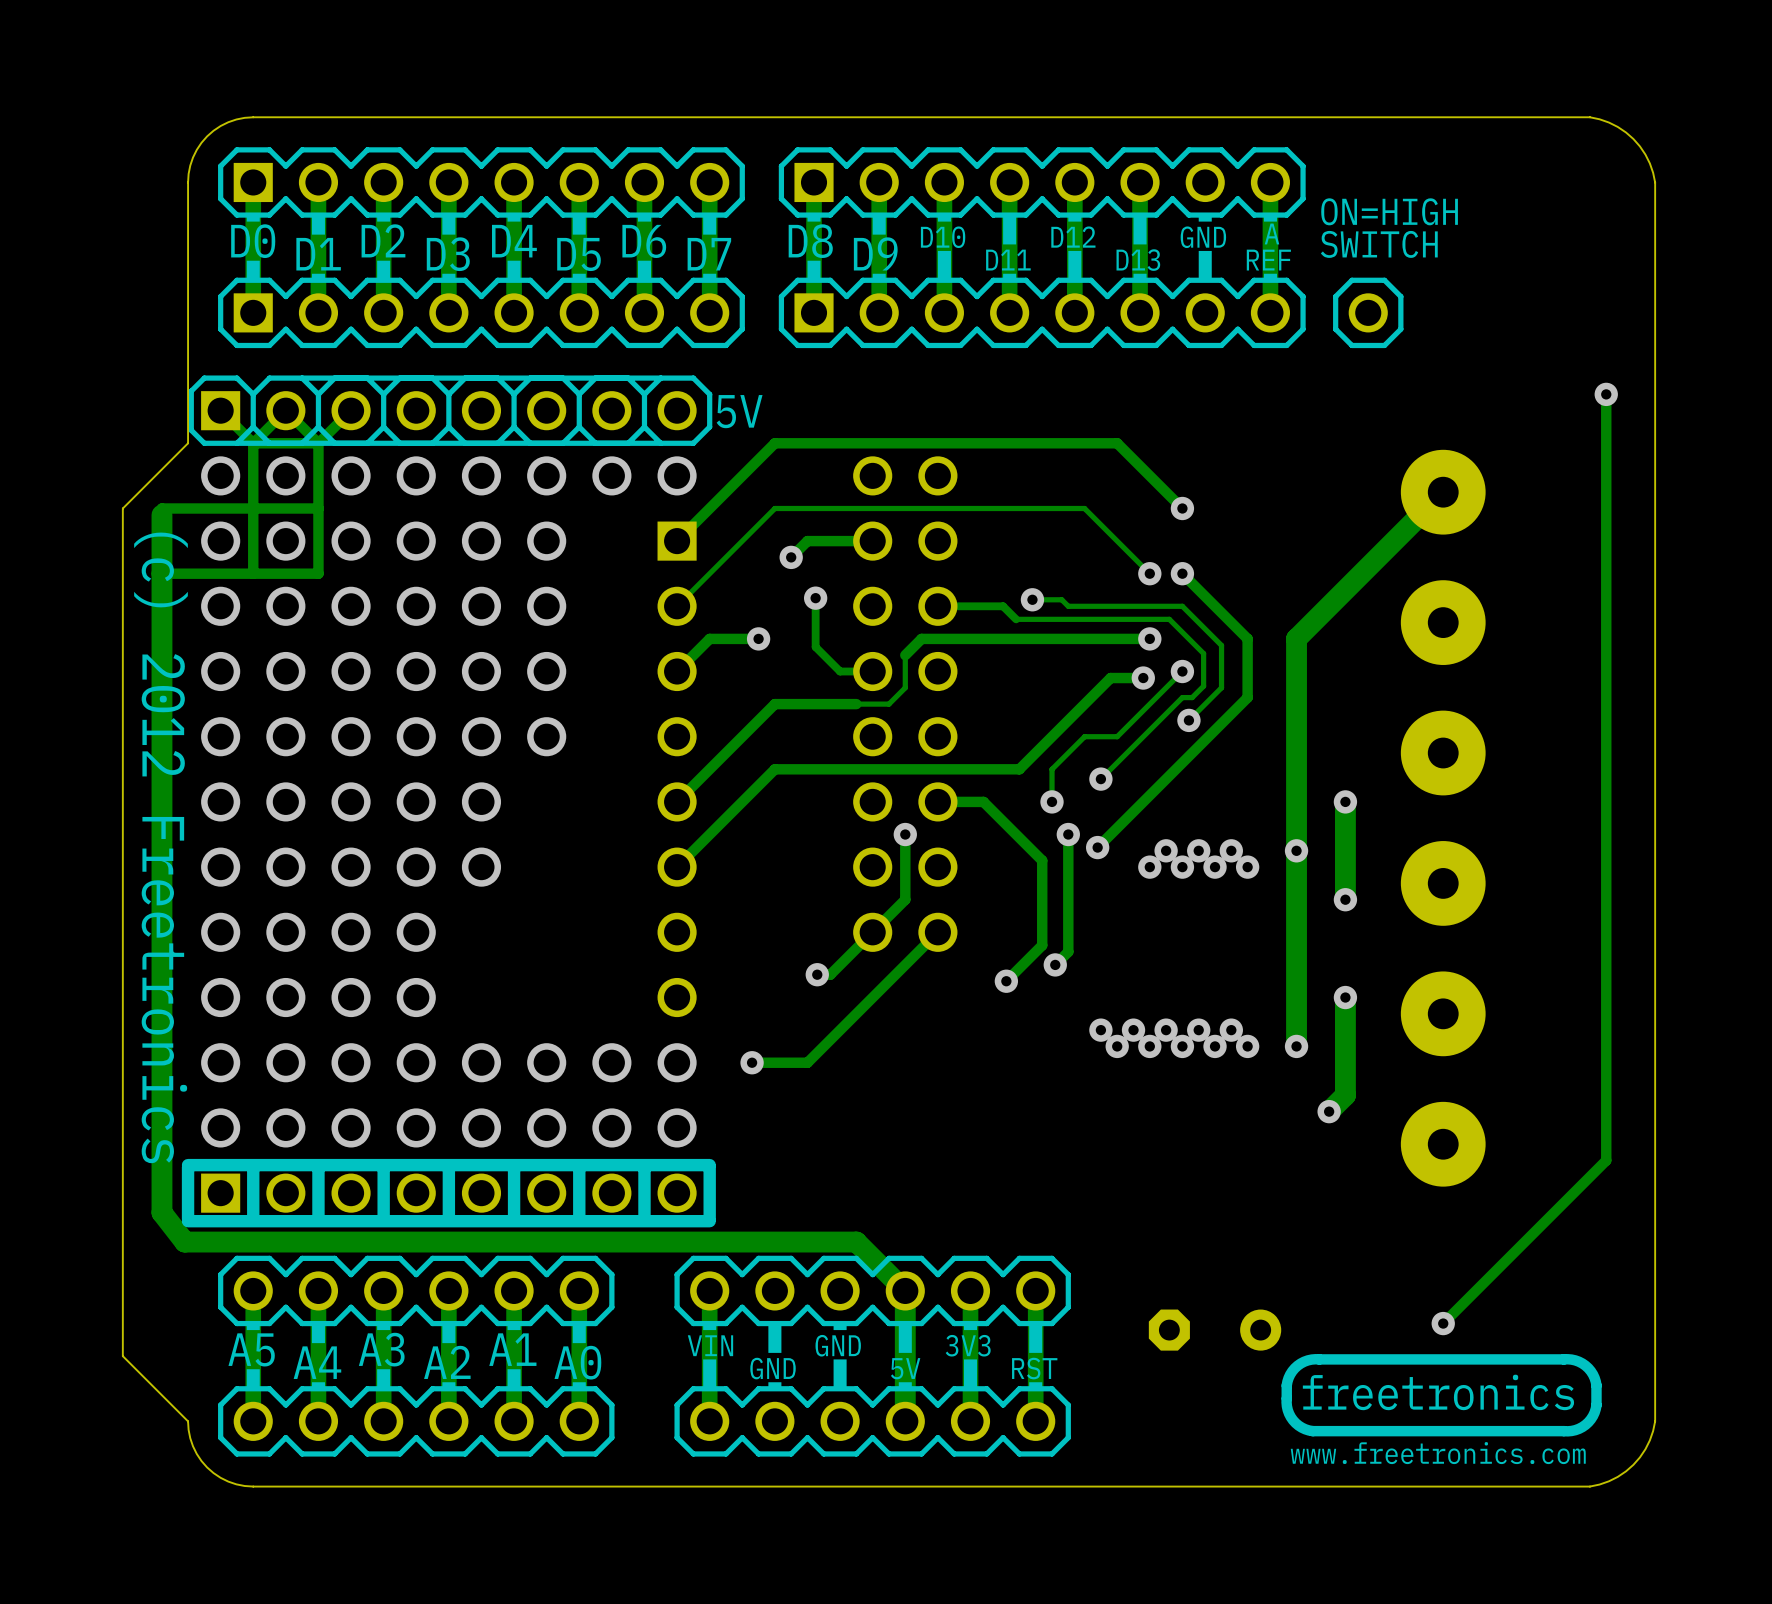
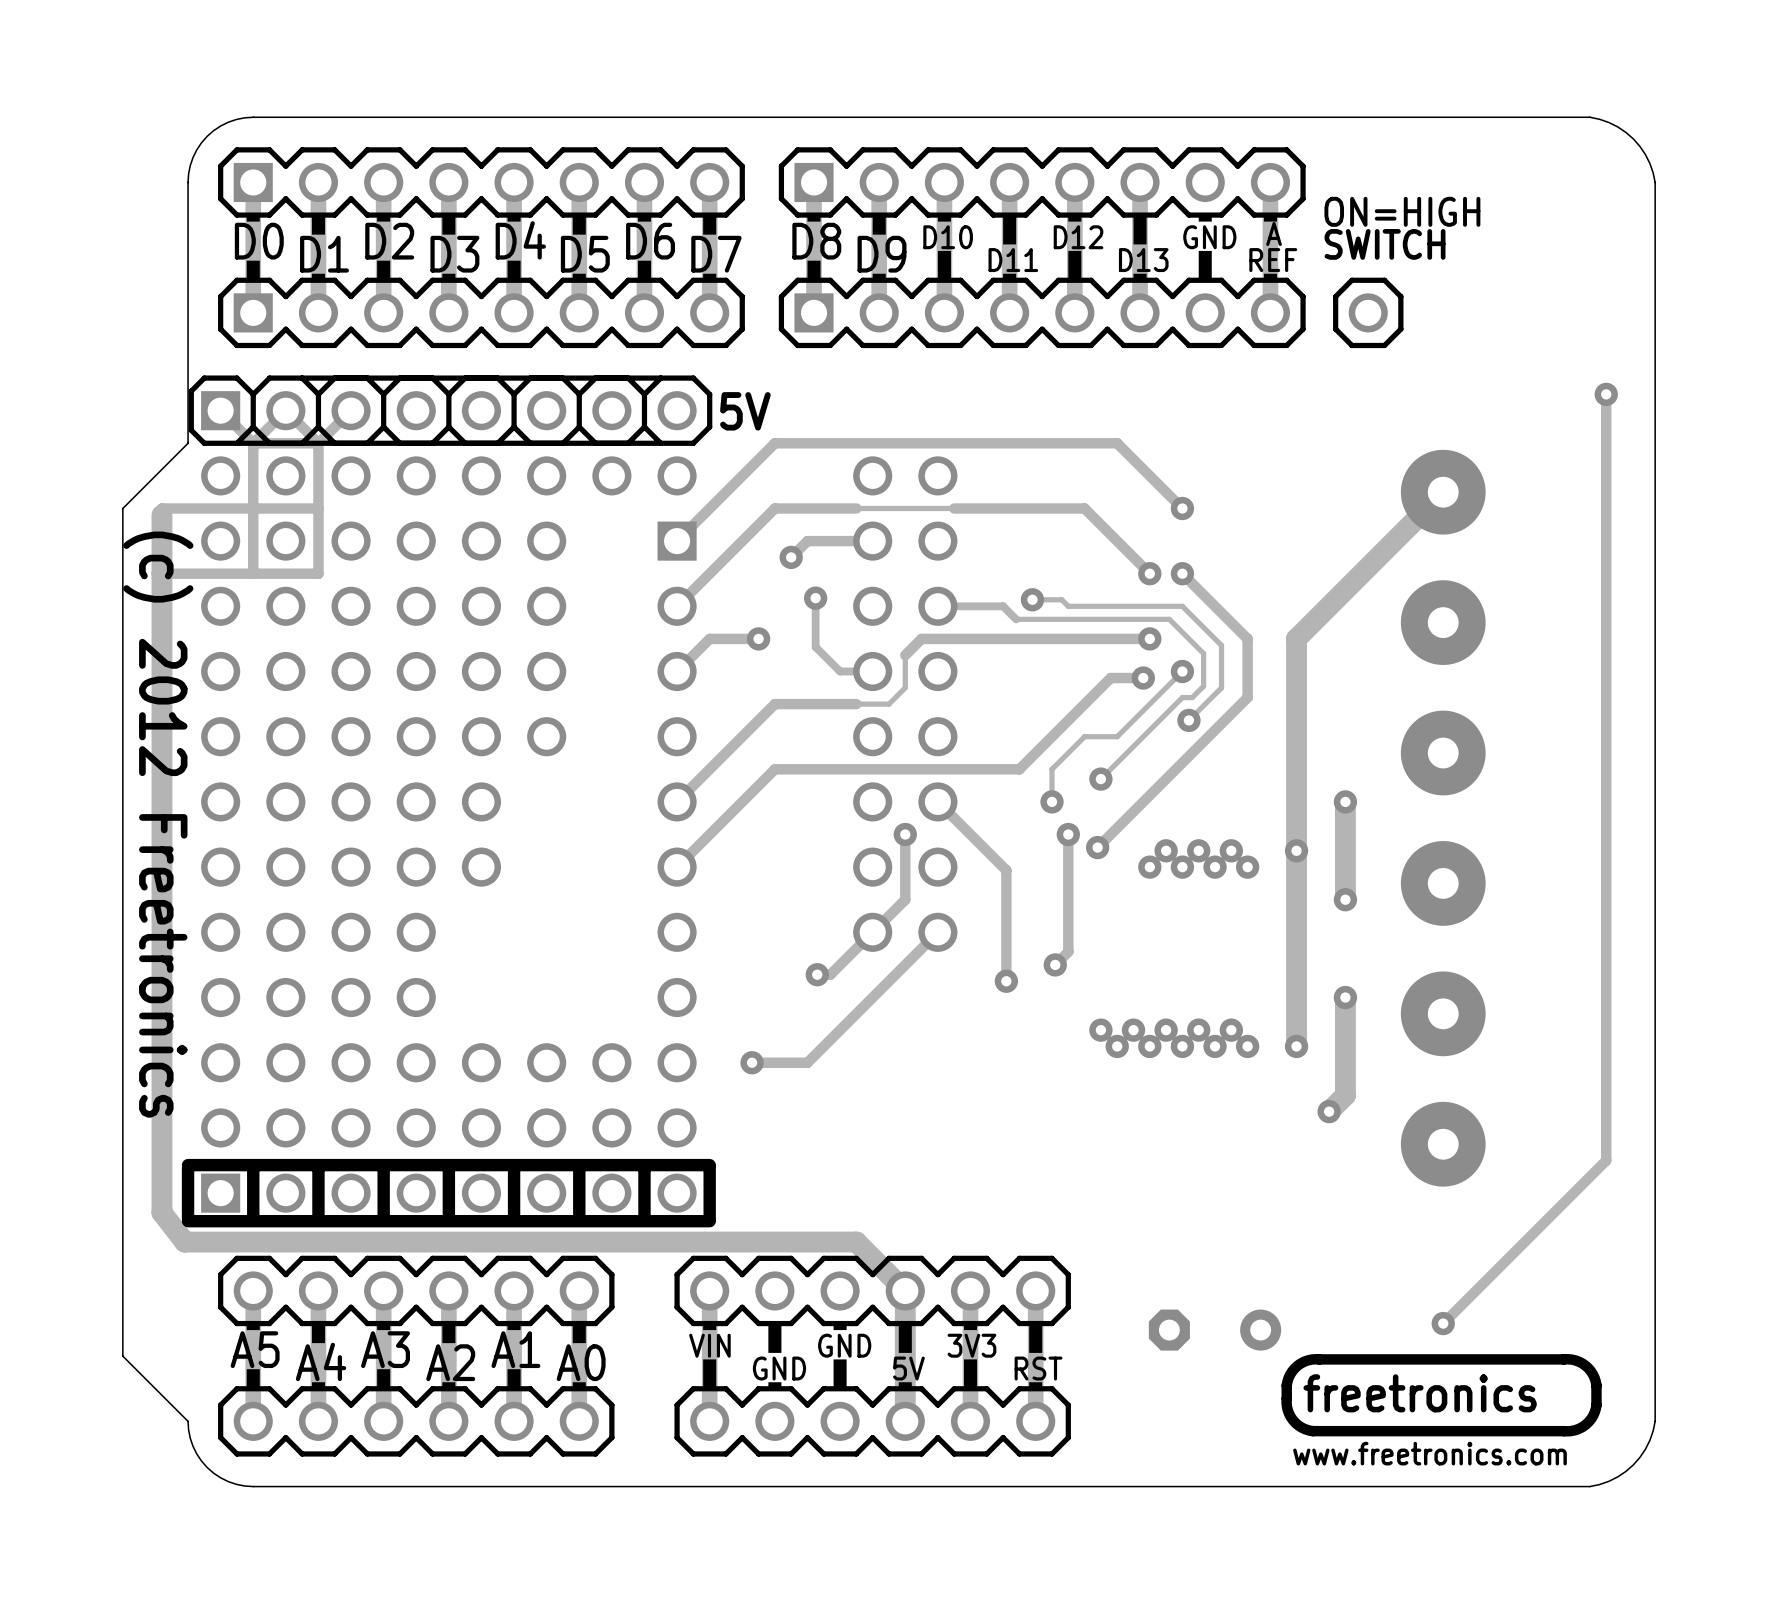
track width: thin (856, 508) (774, 508) (677, 606) -> thick (856, 508) (774, 508) (677, 606)
track width: thin (954, 508) (1084, 508) (1149, 573) -> thick (954, 508) (1084, 508) (1149, 573)
track: (937, 801) (983, 801) (1042, 860) (1042, 945) (1006, 981) -> (937, 801) (1006, 870) (1006, 981)

